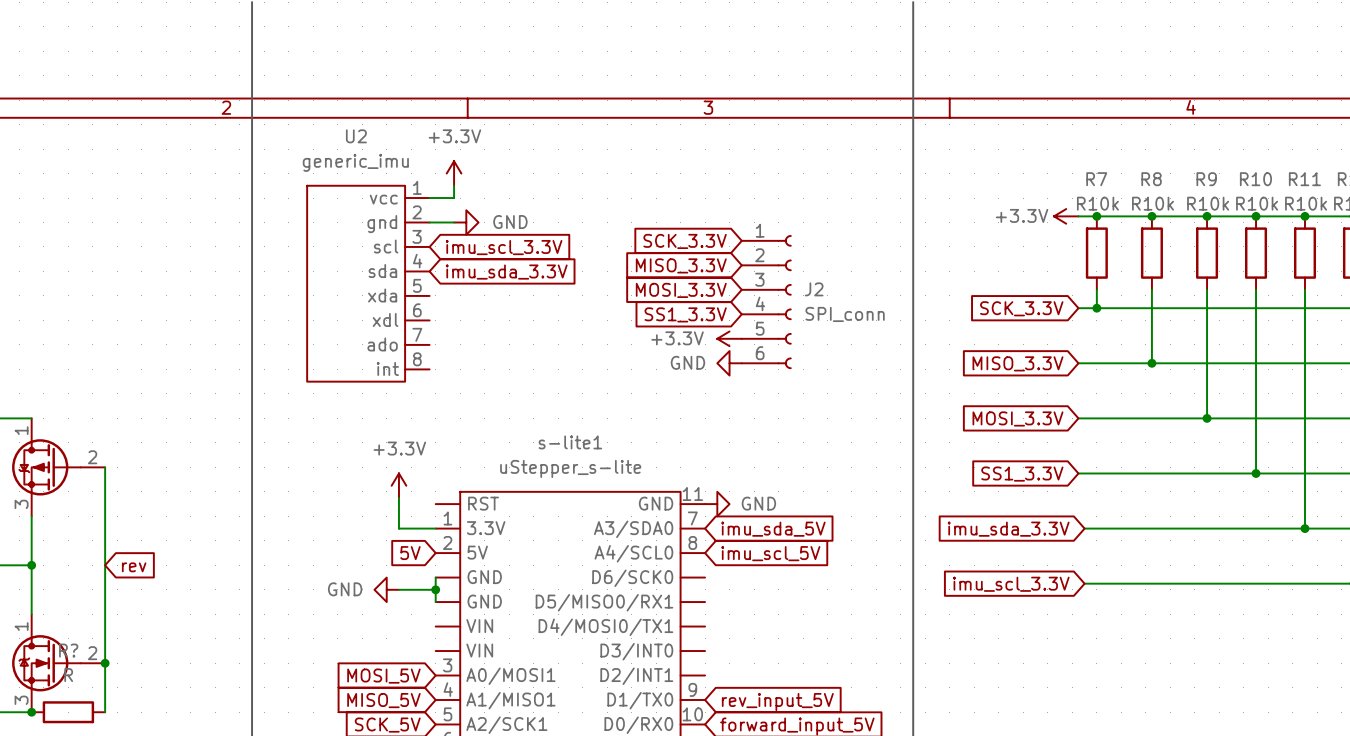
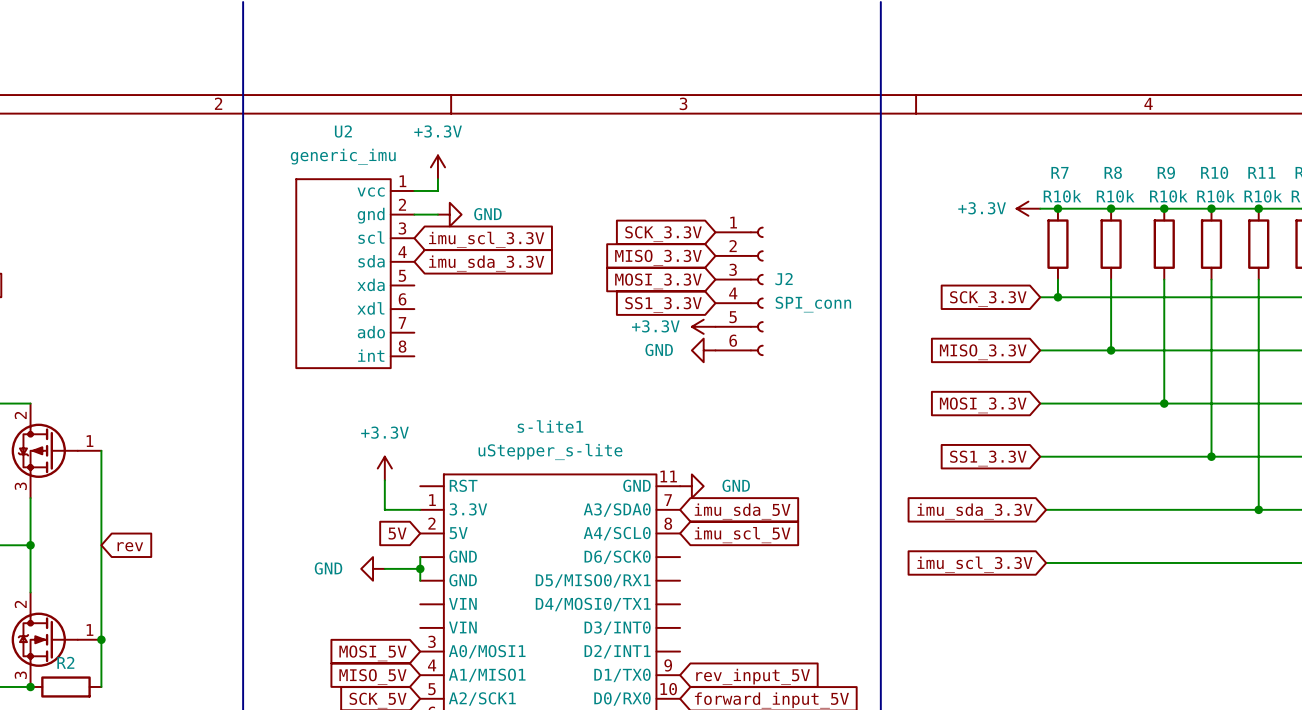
part pin number: 1 (21, 430) -> 2 (20, 415)
part pin number: 2 (92, 457) -> 1 (90, 441)
part pin number: 1 (21, 626) -> 2 (20, 604)
R? name: R? (68, 650) -> R2 (65, 662)
part pin number: 2 (92, 653) -> 1 (90, 630)
R? value: R (68, 675) -> none

